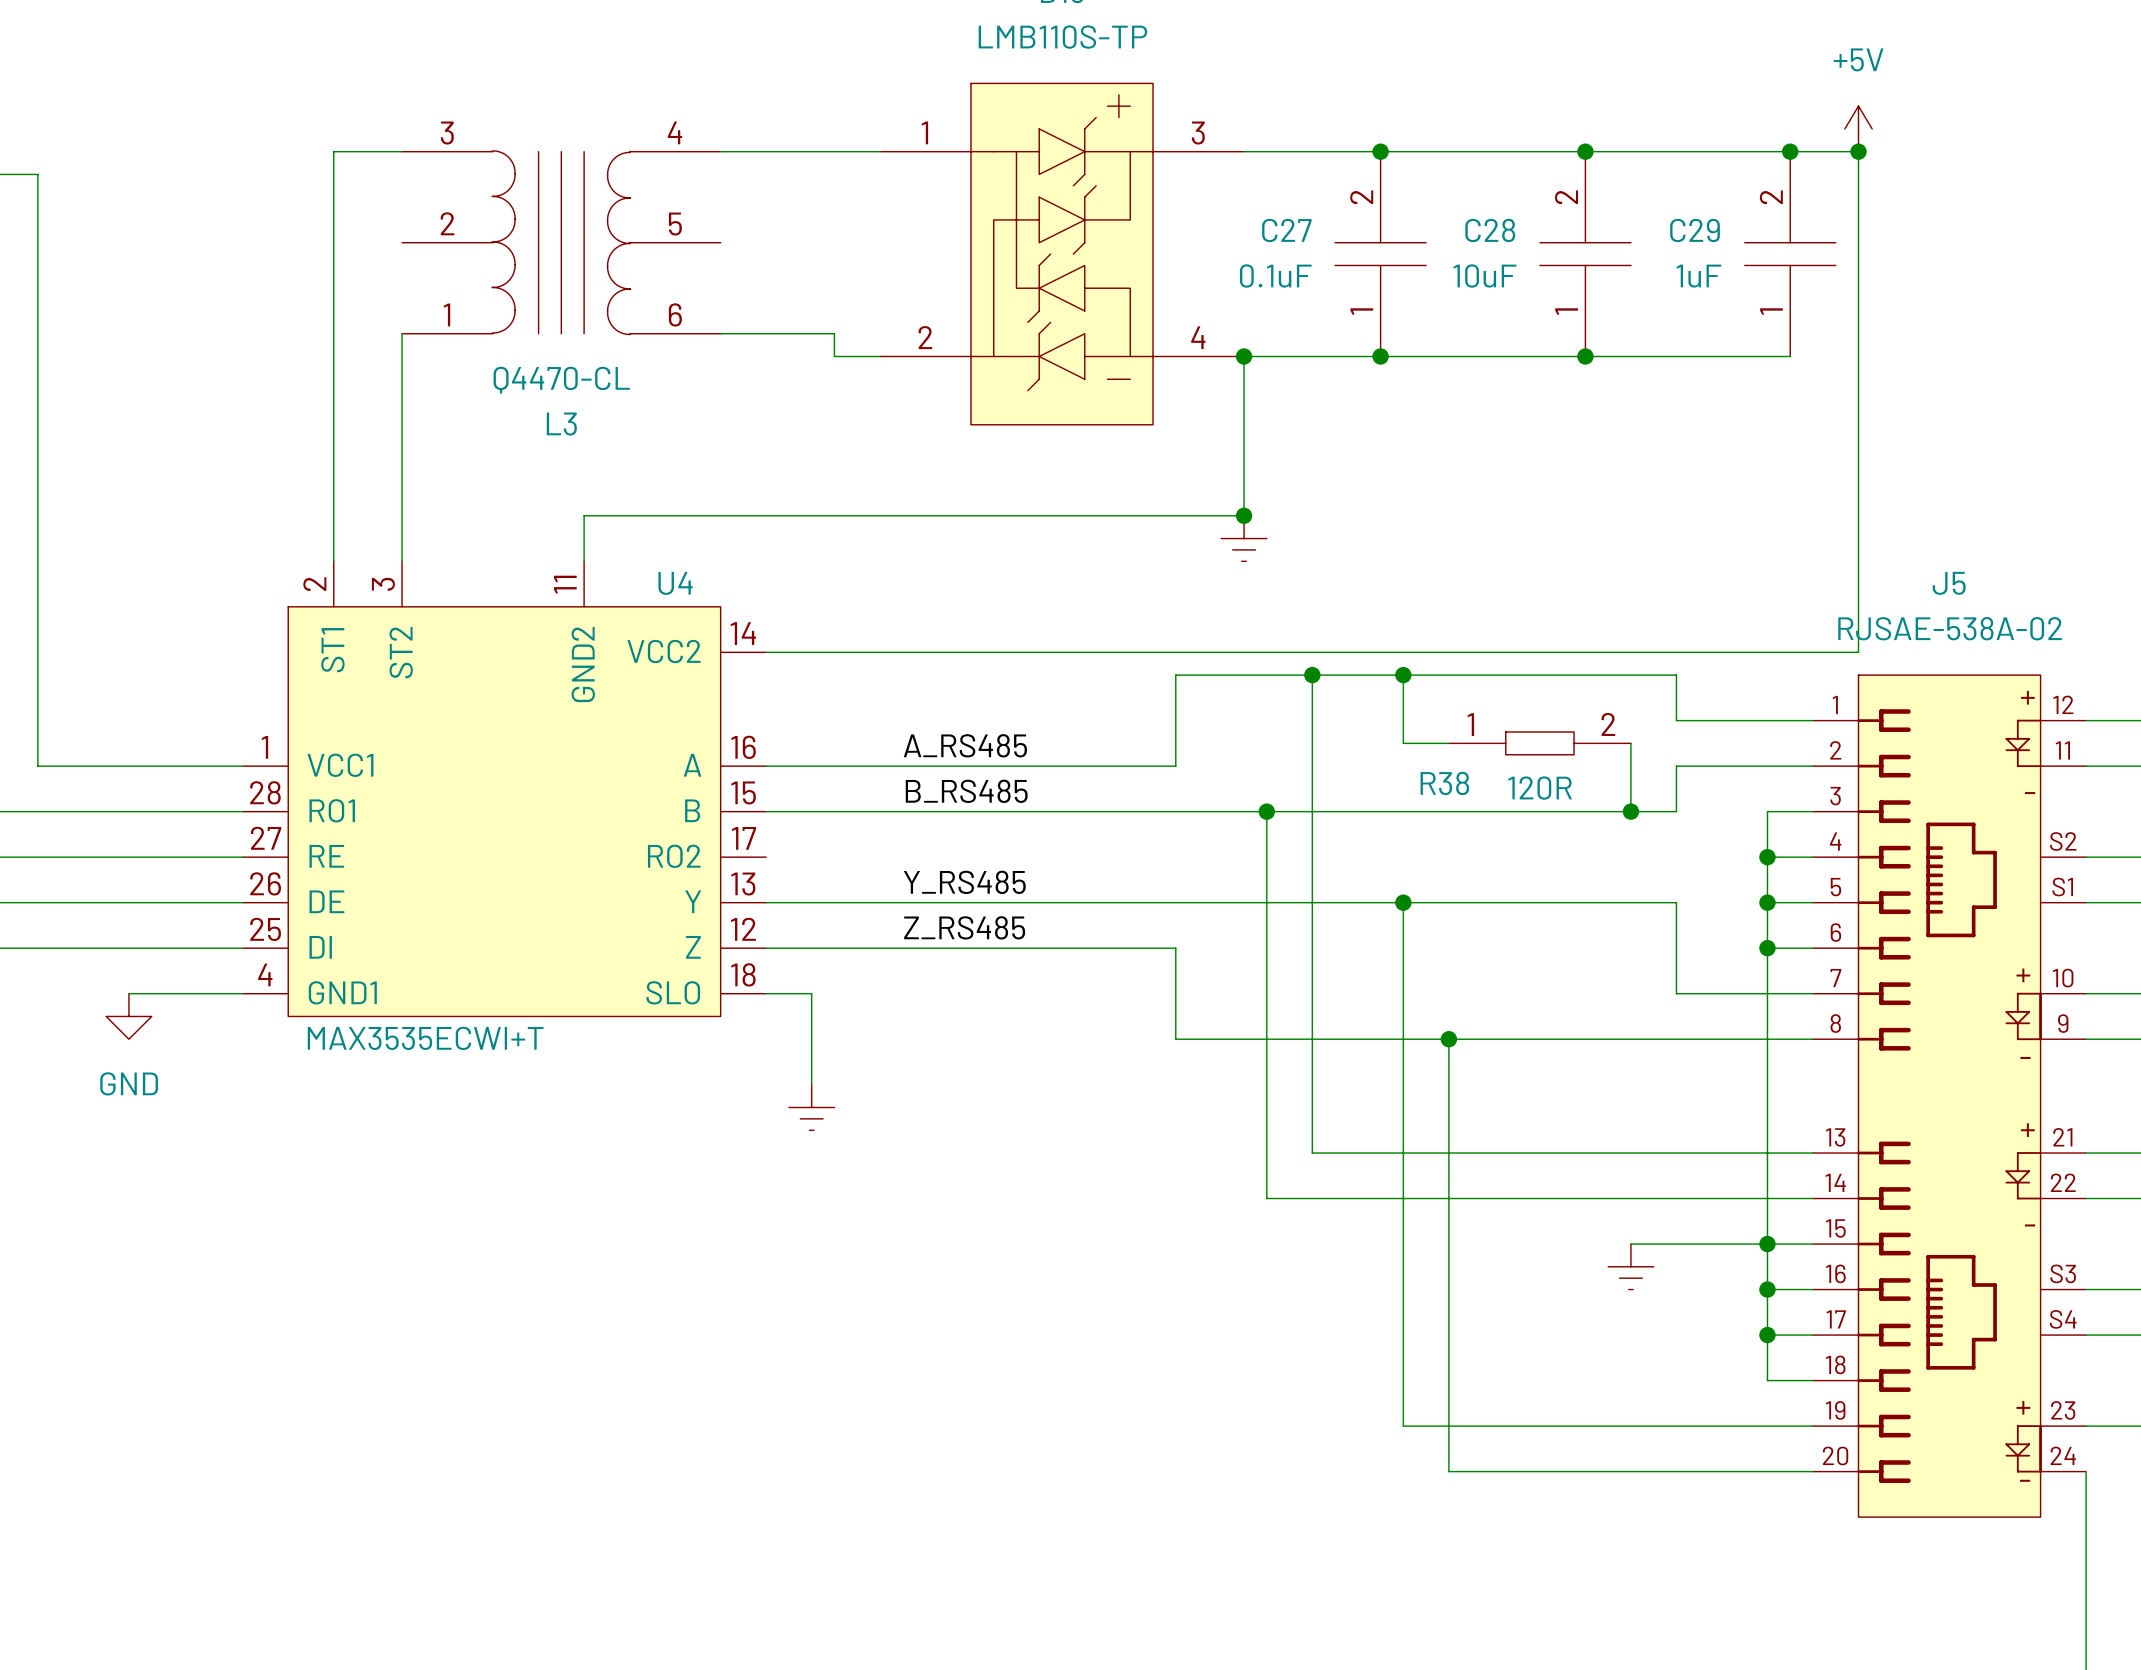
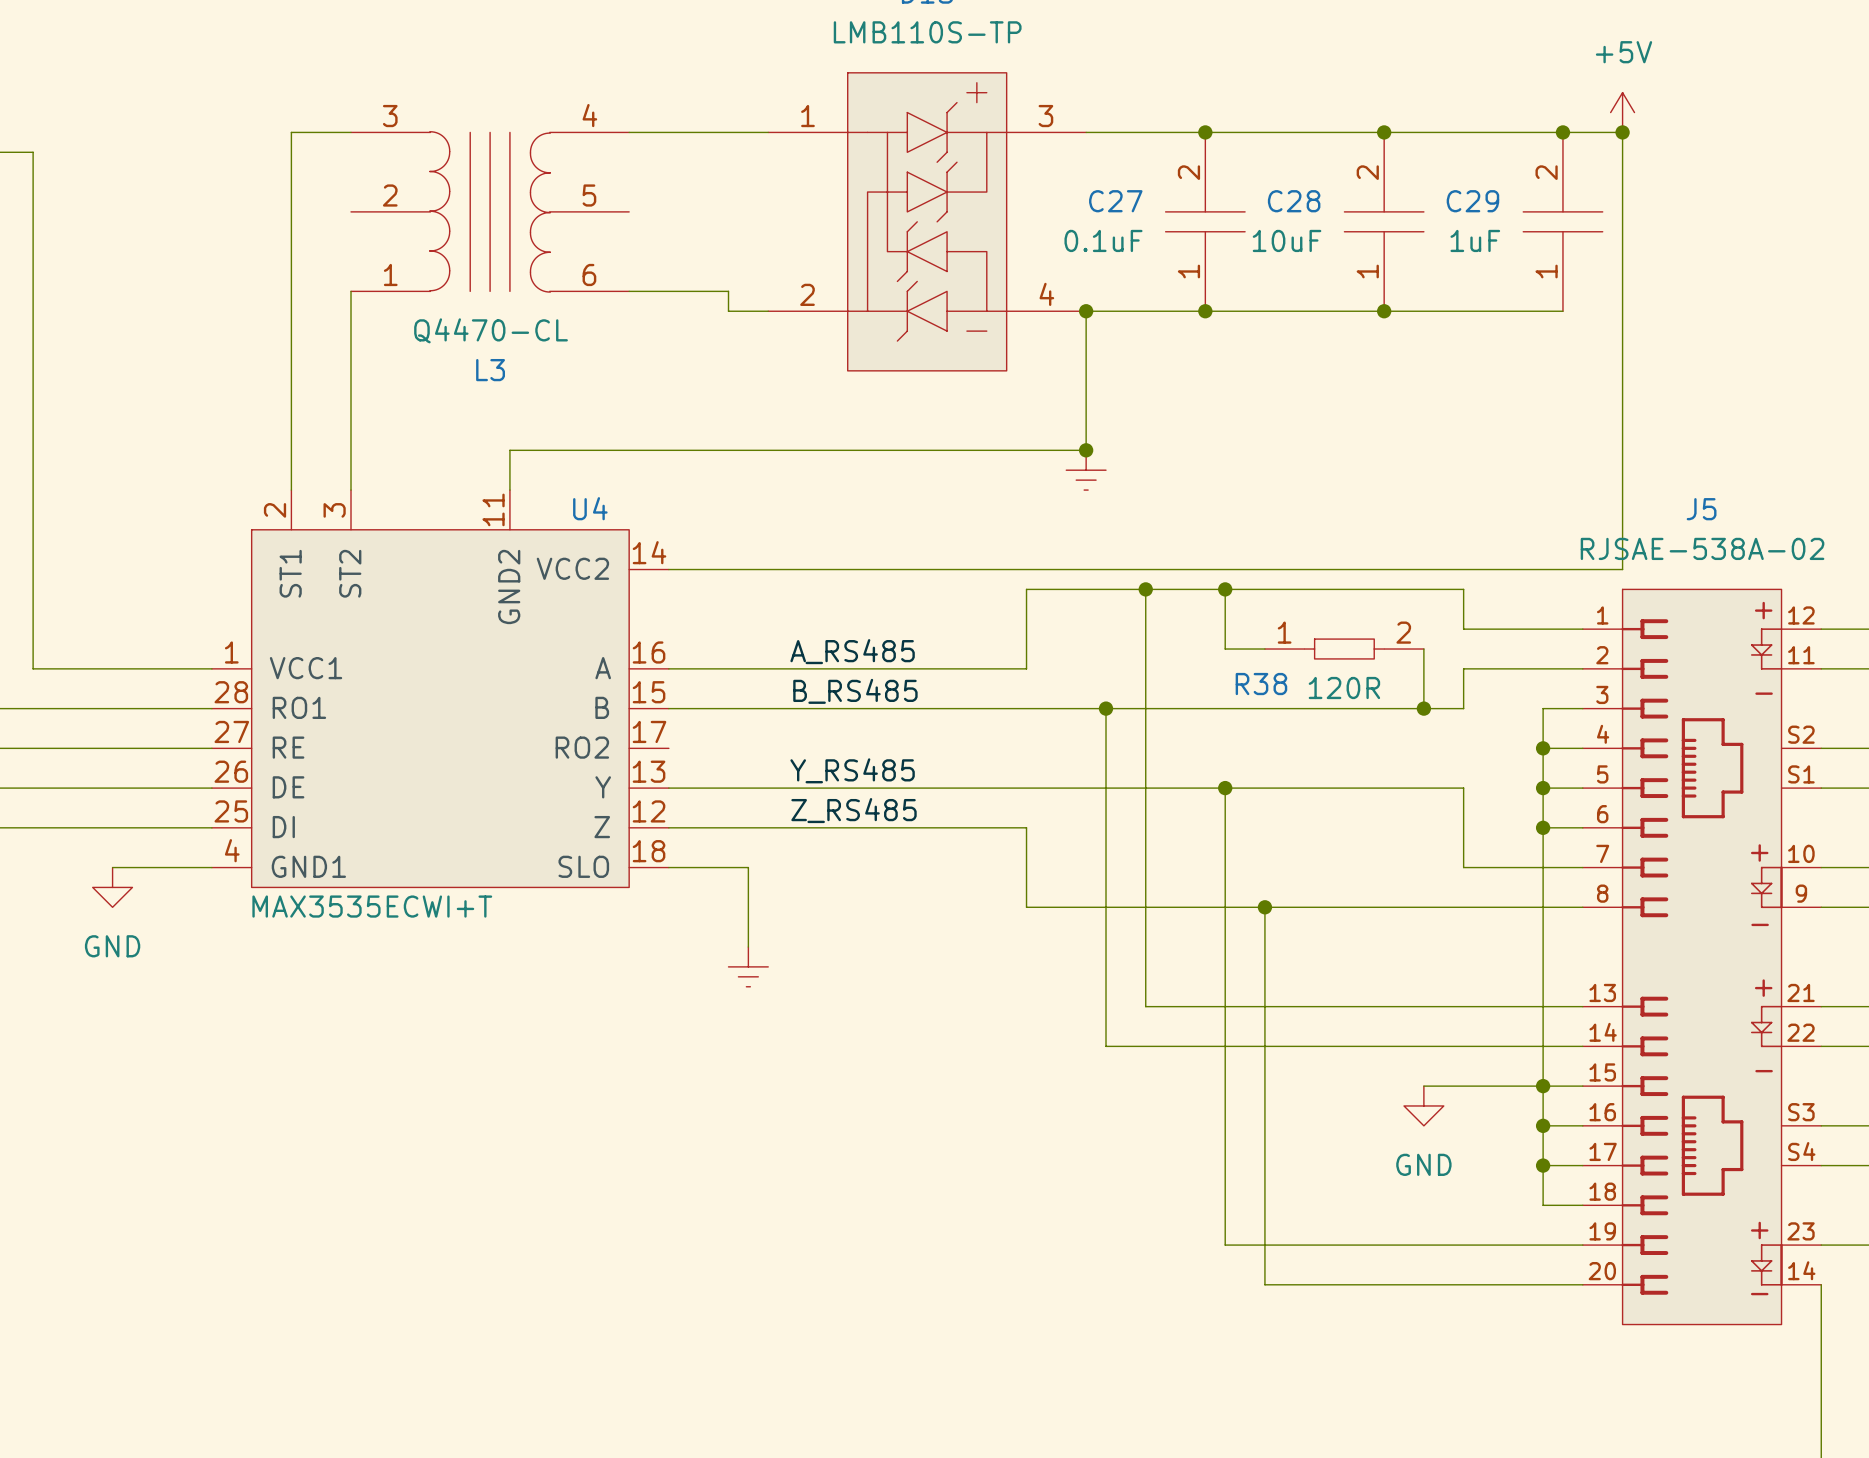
wire: (811, 993) (811, 1084) -> (708, 867) (748, 867) (748, 947)
power symbol position: (811, 1107) -> (748, 966)
power symbol shape: [1608, 1244, 1654, 1290] -> [1404, 1086, 1444, 1126]
power symbol text: none -> GND (1423, 1164)
J5 pin number: 24 (2063, 1455) -> 14 (1801, 1270)

